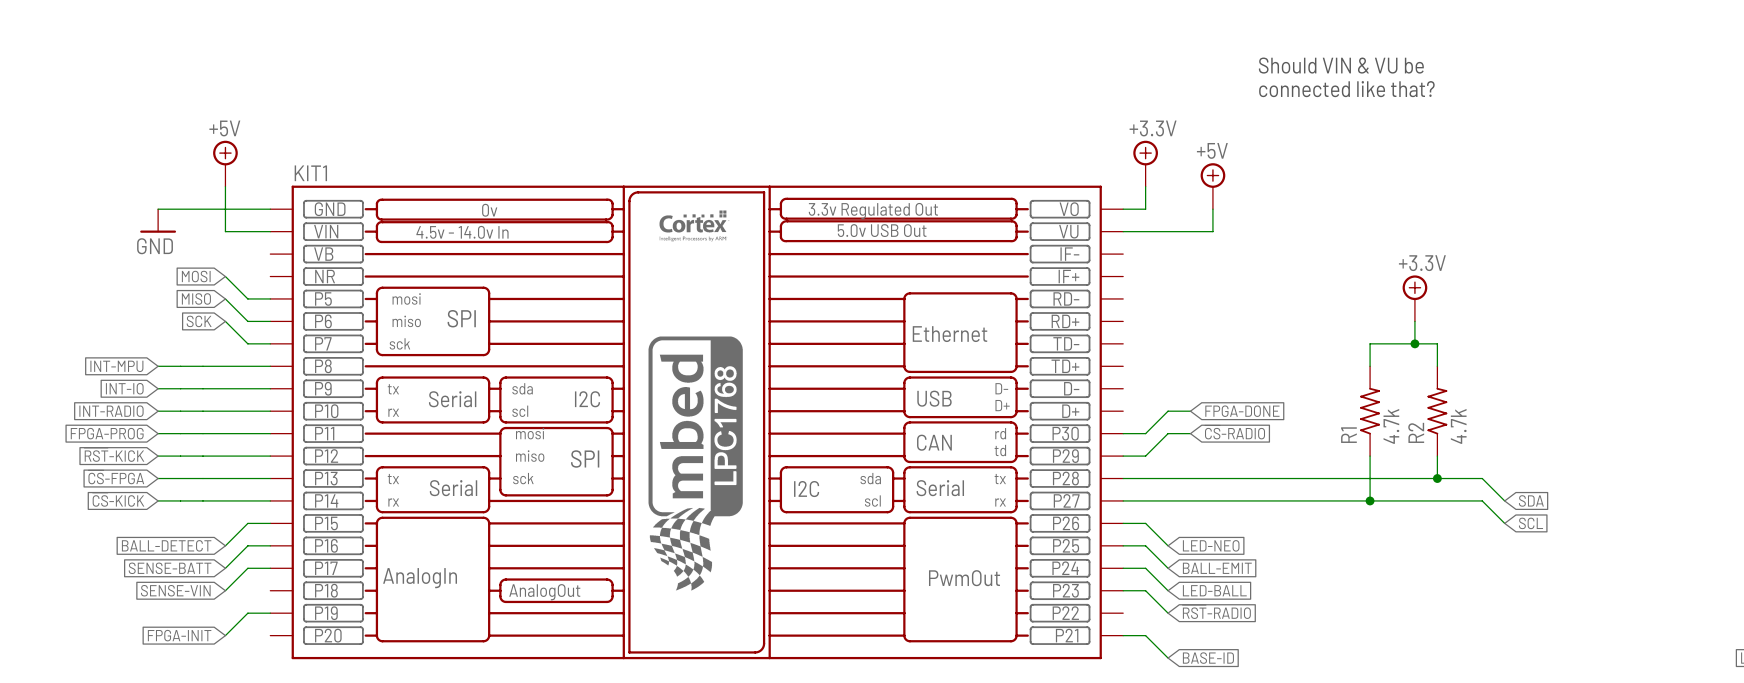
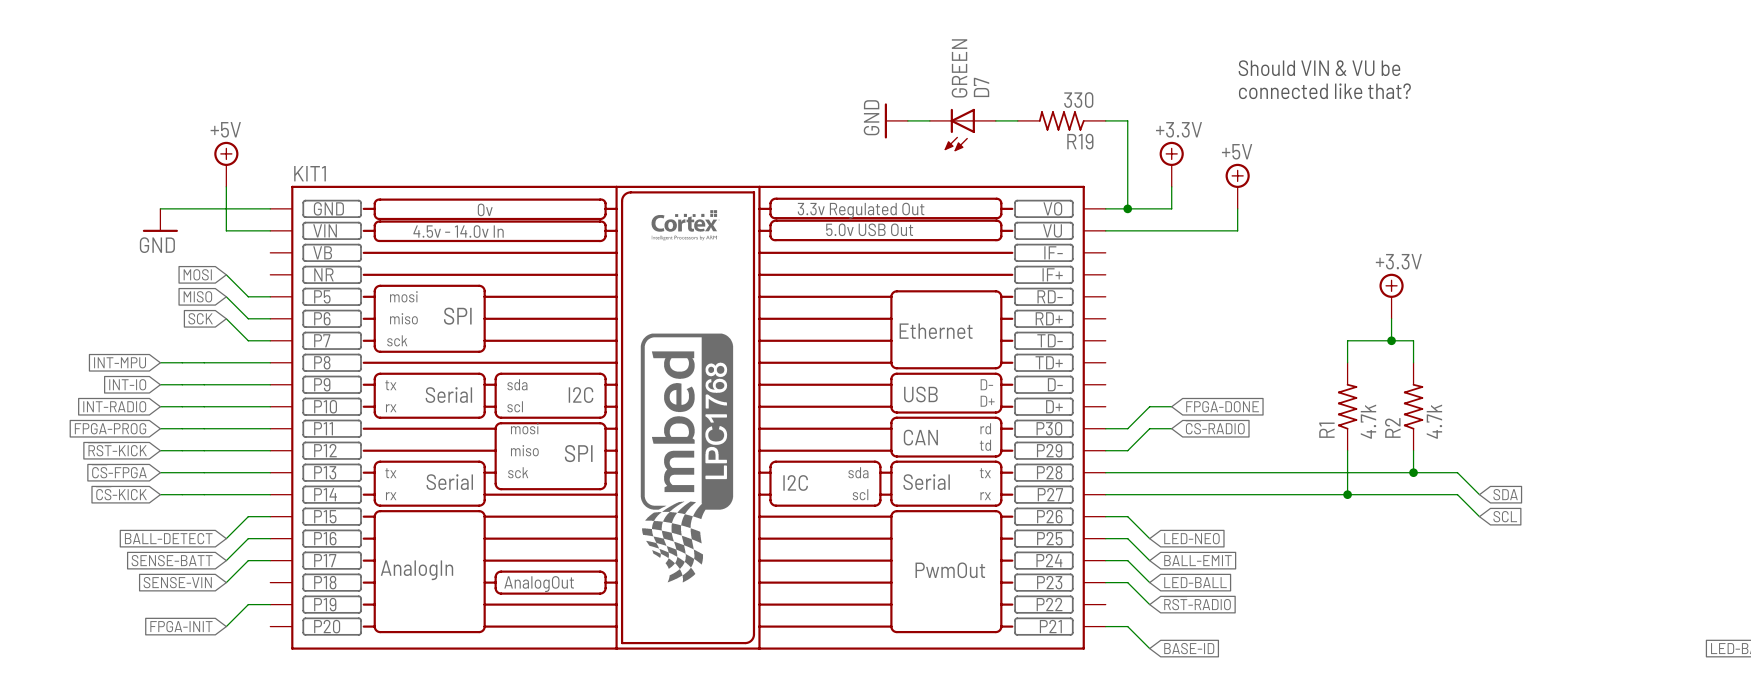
power symbol: none -> GND (896, 120)
wire: none -> (907, 120) (929, 120)
wire: none -> (995, 120) (1017, 120)
R19: none -> 330 (1061, 120)
wire: none -> (1105, 120) (1127, 120) (1127, 186)
D7: none -> GREEN (962, 130)
power symbol position: +3.3V (1145, 163) -> +3.3V (1171, 164)
wire: none -> (1171, 186) (1171, 208) (1127, 208)
power symbol position: +5V (1212, 186) -> +5V (1237, 186)
junction: none -> (1127, 208)
wire: (1212, 209) (1212, 231) -> (1237, 208) (1237, 230) (1193, 230)

